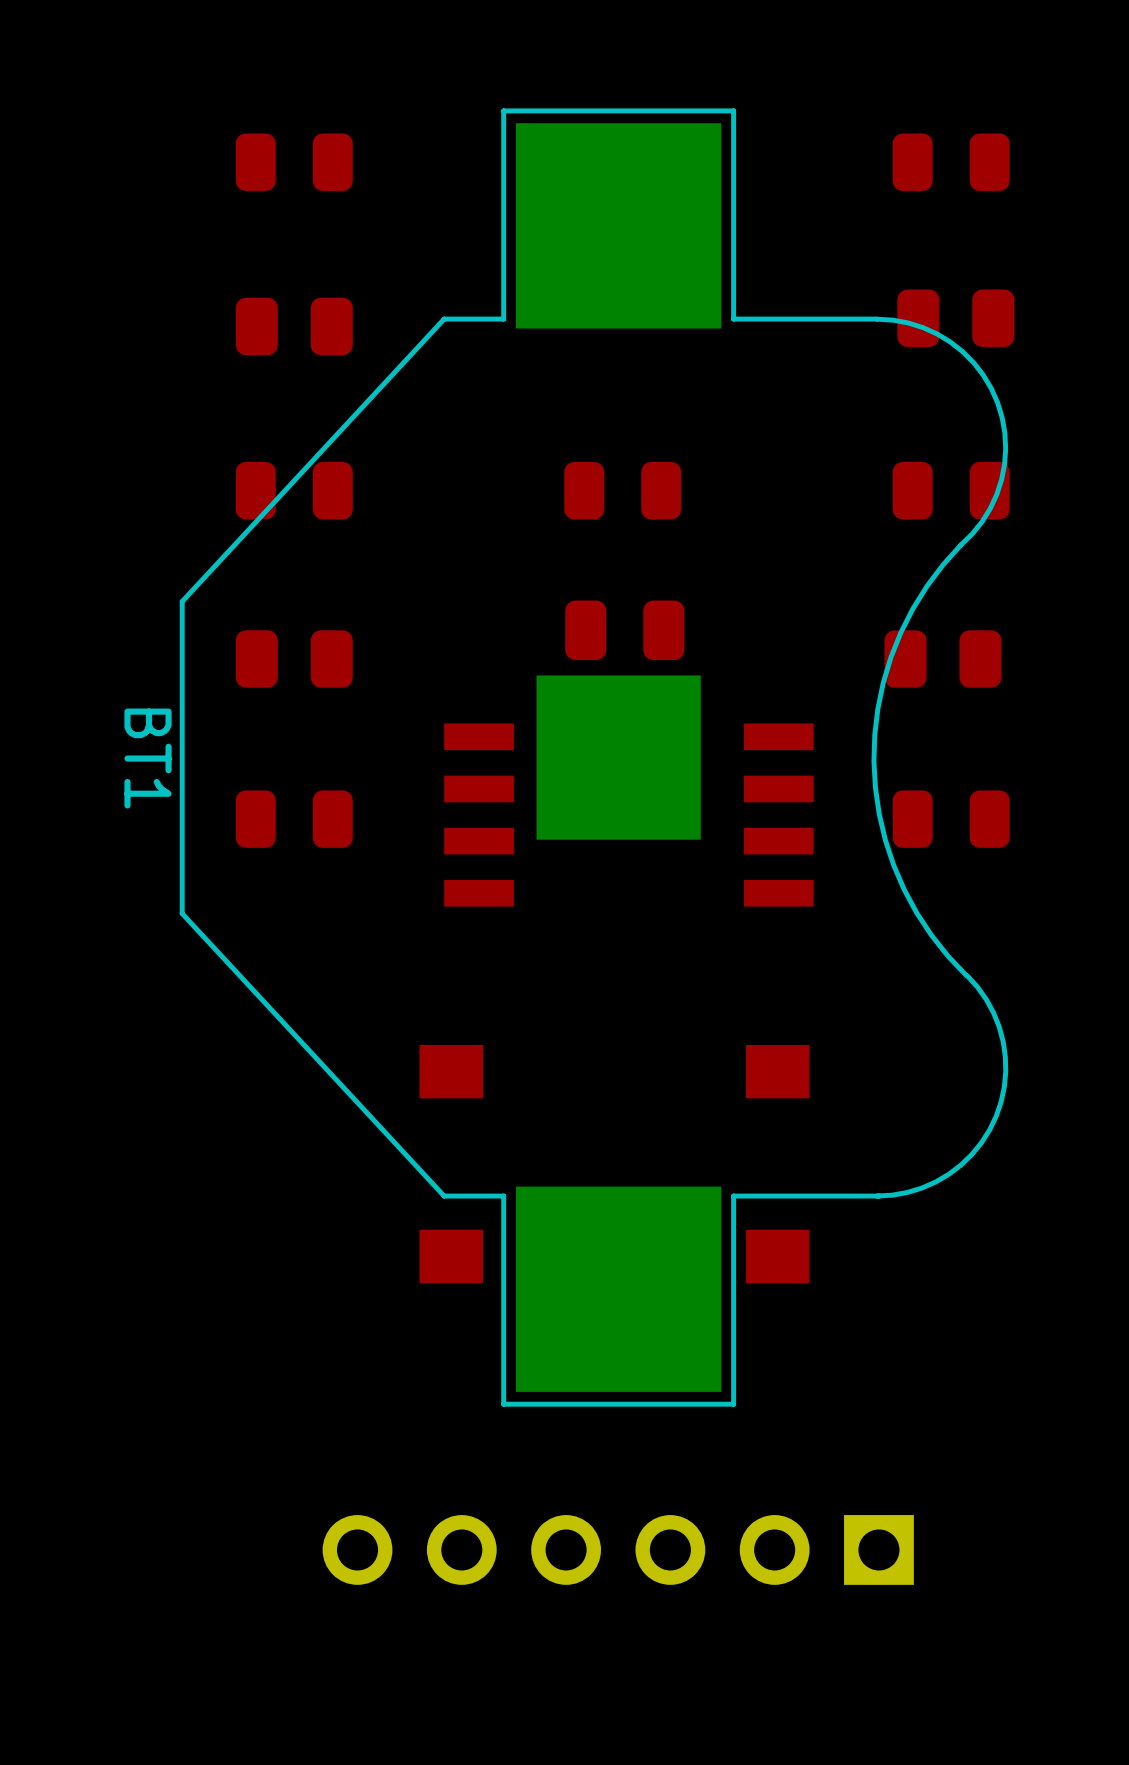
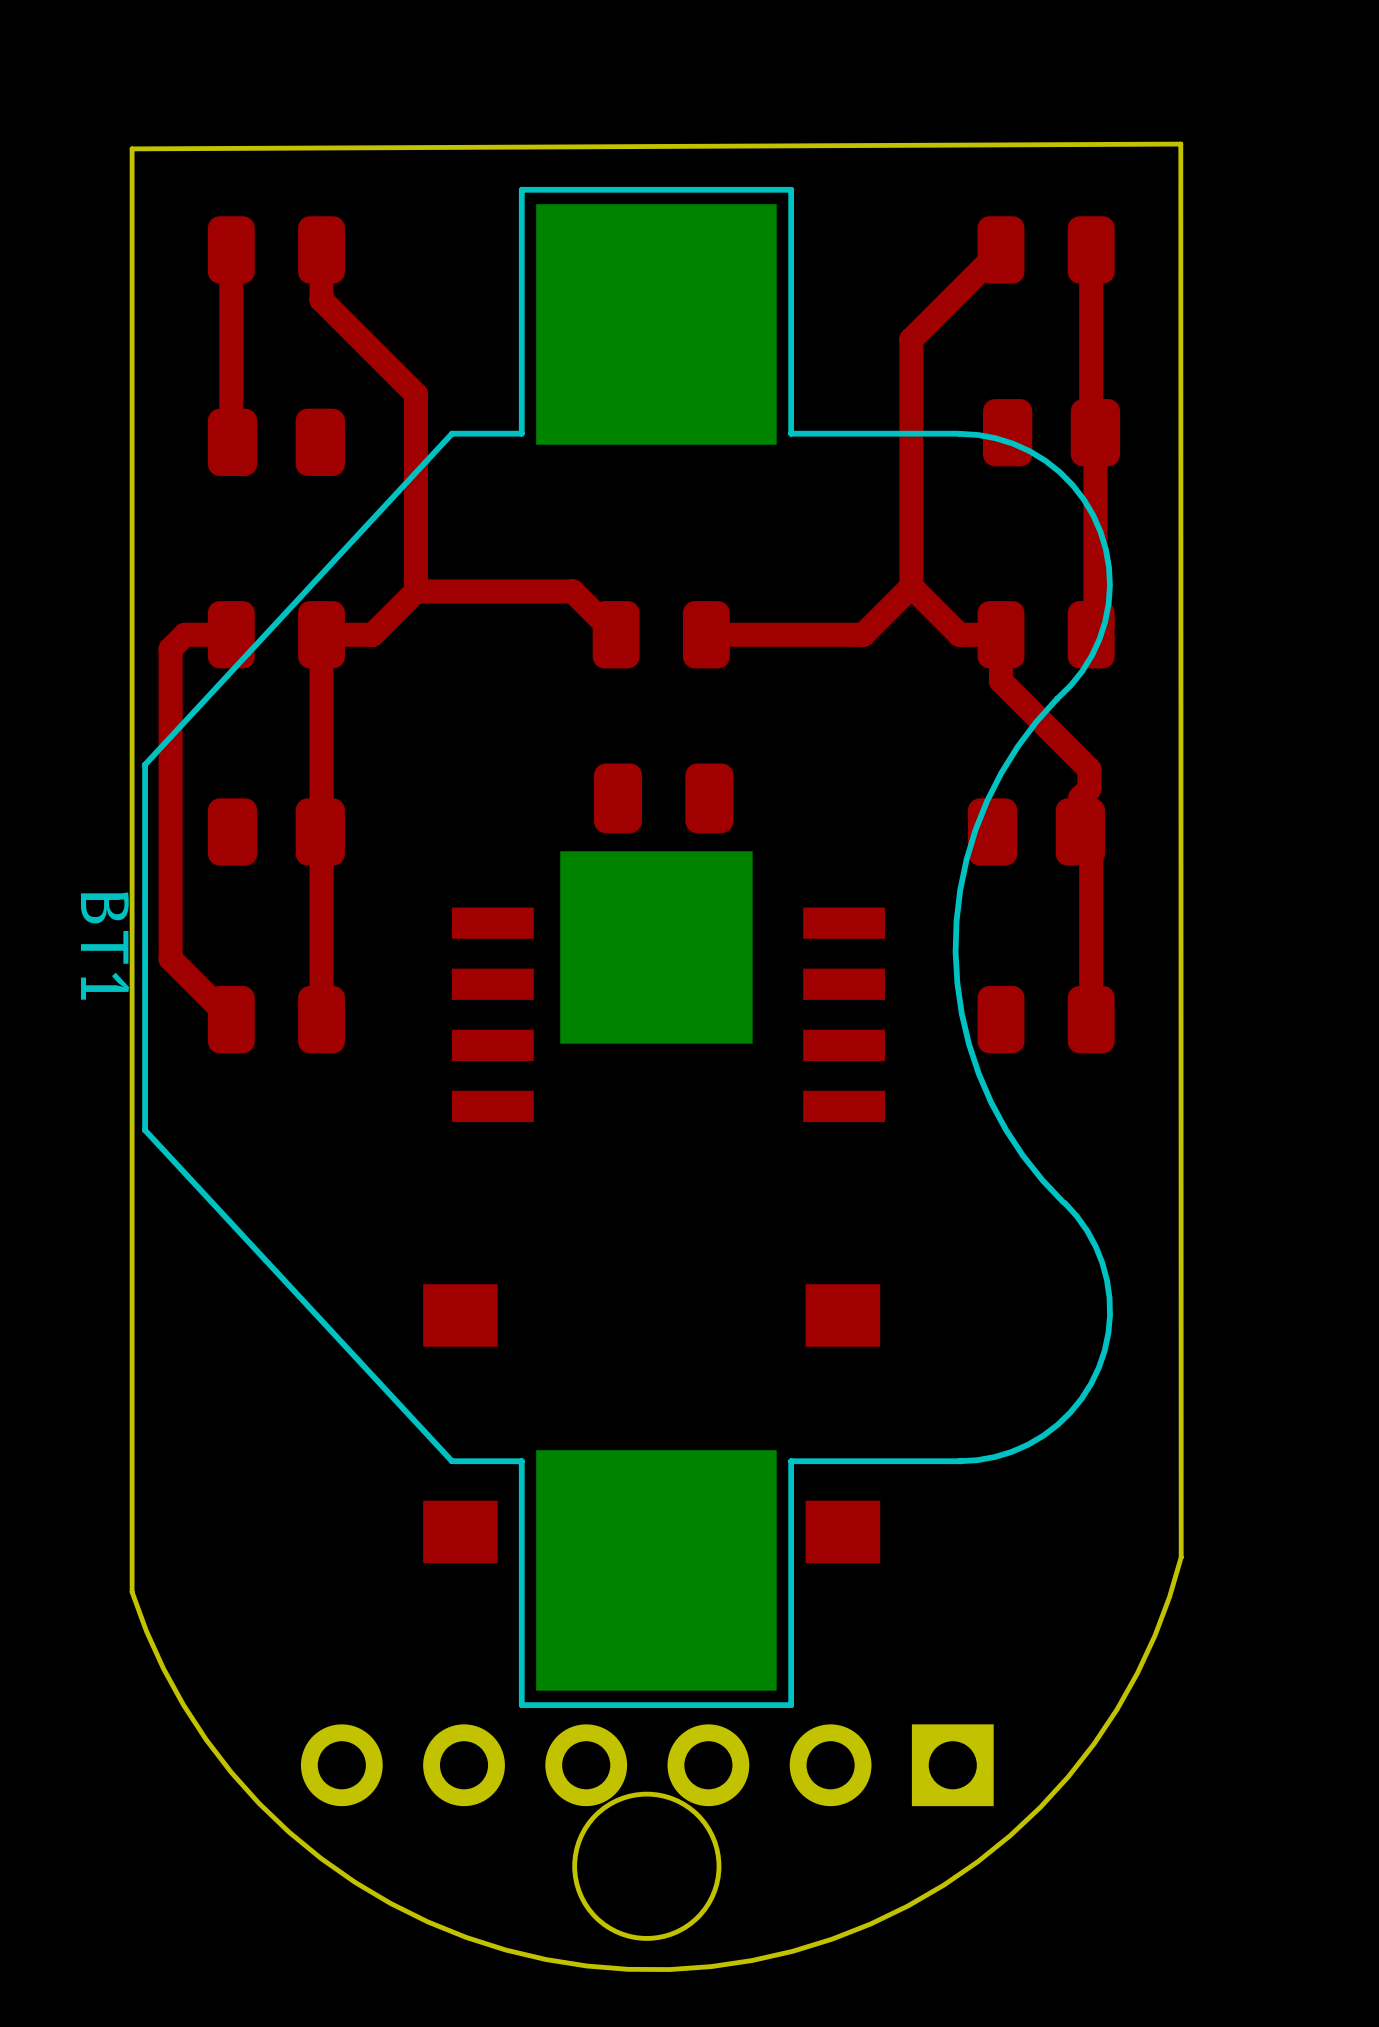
board edge: none -> (1180, 144) (1181, 1557) (1169, 1597) (1154, 1635) (1137, 1673) (1117, 1709) (1093, 1744) (1068, 1776) (1040, 1807) (1010, 1835) (977, 1861) (943, 1885) (907, 1905) (870, 1924) (832, 1939) (792, 1951) (752, 1960) (711, 1966) (669, 1969) (628, 1969) (586, 1966) (546, 1959) (505, 1949) (466, 1937) (427, 1921) (390, 1903) (354, 1882) (321, 1858) (289, 1832) (259, 1803) (231, 1772) (206, 1739) (183, 1705) (163, 1668) (146, 1630) (132, 1592) (132, 148) (1180, 144)
top track: none -> (231, 249) (232, 442)
top track: none -> (321, 249) (321, 299) (415, 394) (415, 591)
top track: none -> (1001, 249) (911, 339) (911, 586)
top track: none -> (1091, 249) (1091, 428) (1095, 432) (1095, 630) (1091, 634)
top track: none -> (911, 586) (959, 634) (1001, 634) (1001, 681) (1089, 769) (1089, 788) (1080, 797) (1080, 832) (1091, 842) (1091, 1019)
top track: none -> (911, 586) (863, 634) (706, 634)
top track: none -> (415, 591) (372, 634) (321, 634) (321, 1019)
top track: none -> (415, 591) (572, 591) (616, 634)
top track: none -> (231, 634) (185, 634) (170, 649) (170, 958) (231, 1019)
round board edge: none -> [572, 1791, 722, 1941]
part position: (618, 1549) -> (647, 1765)

